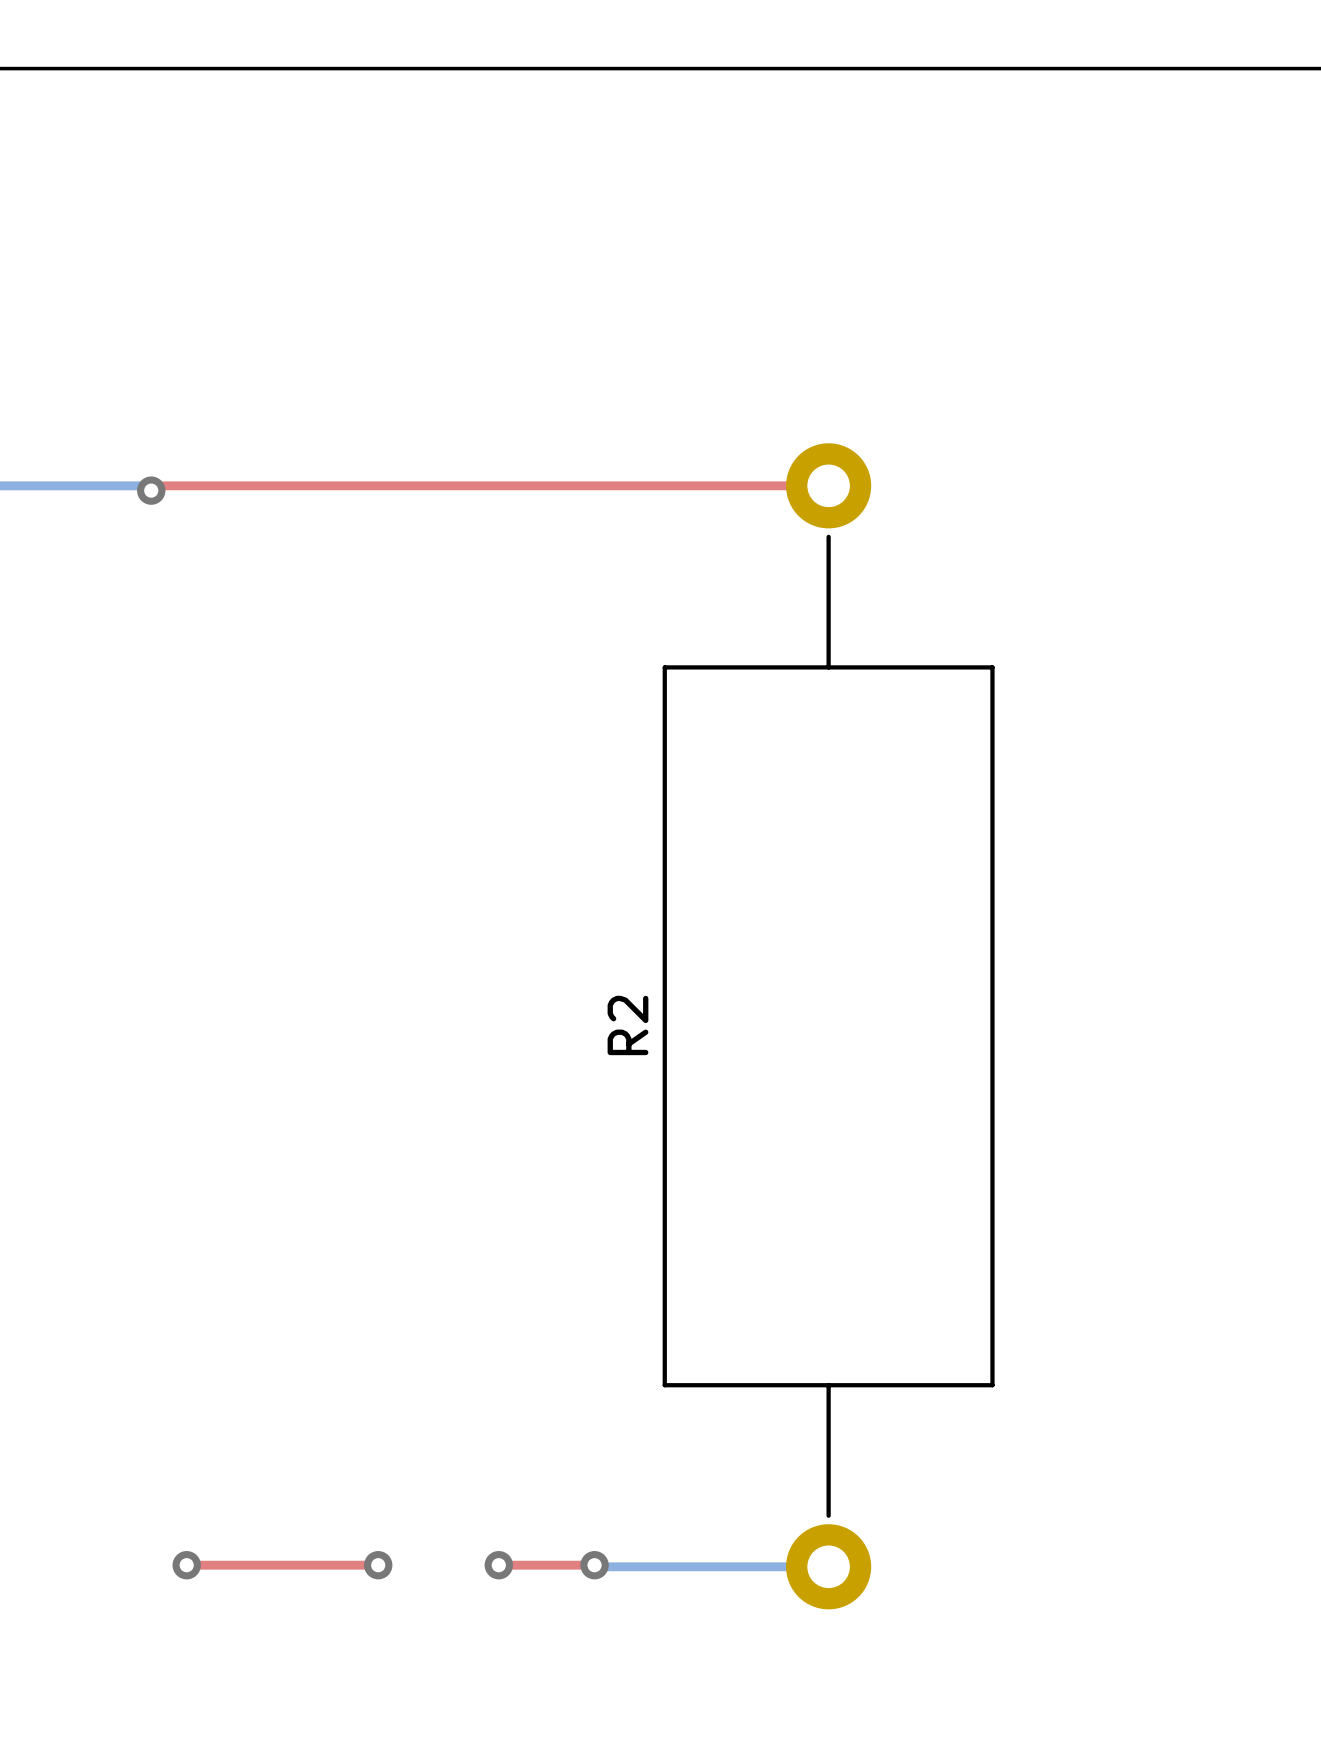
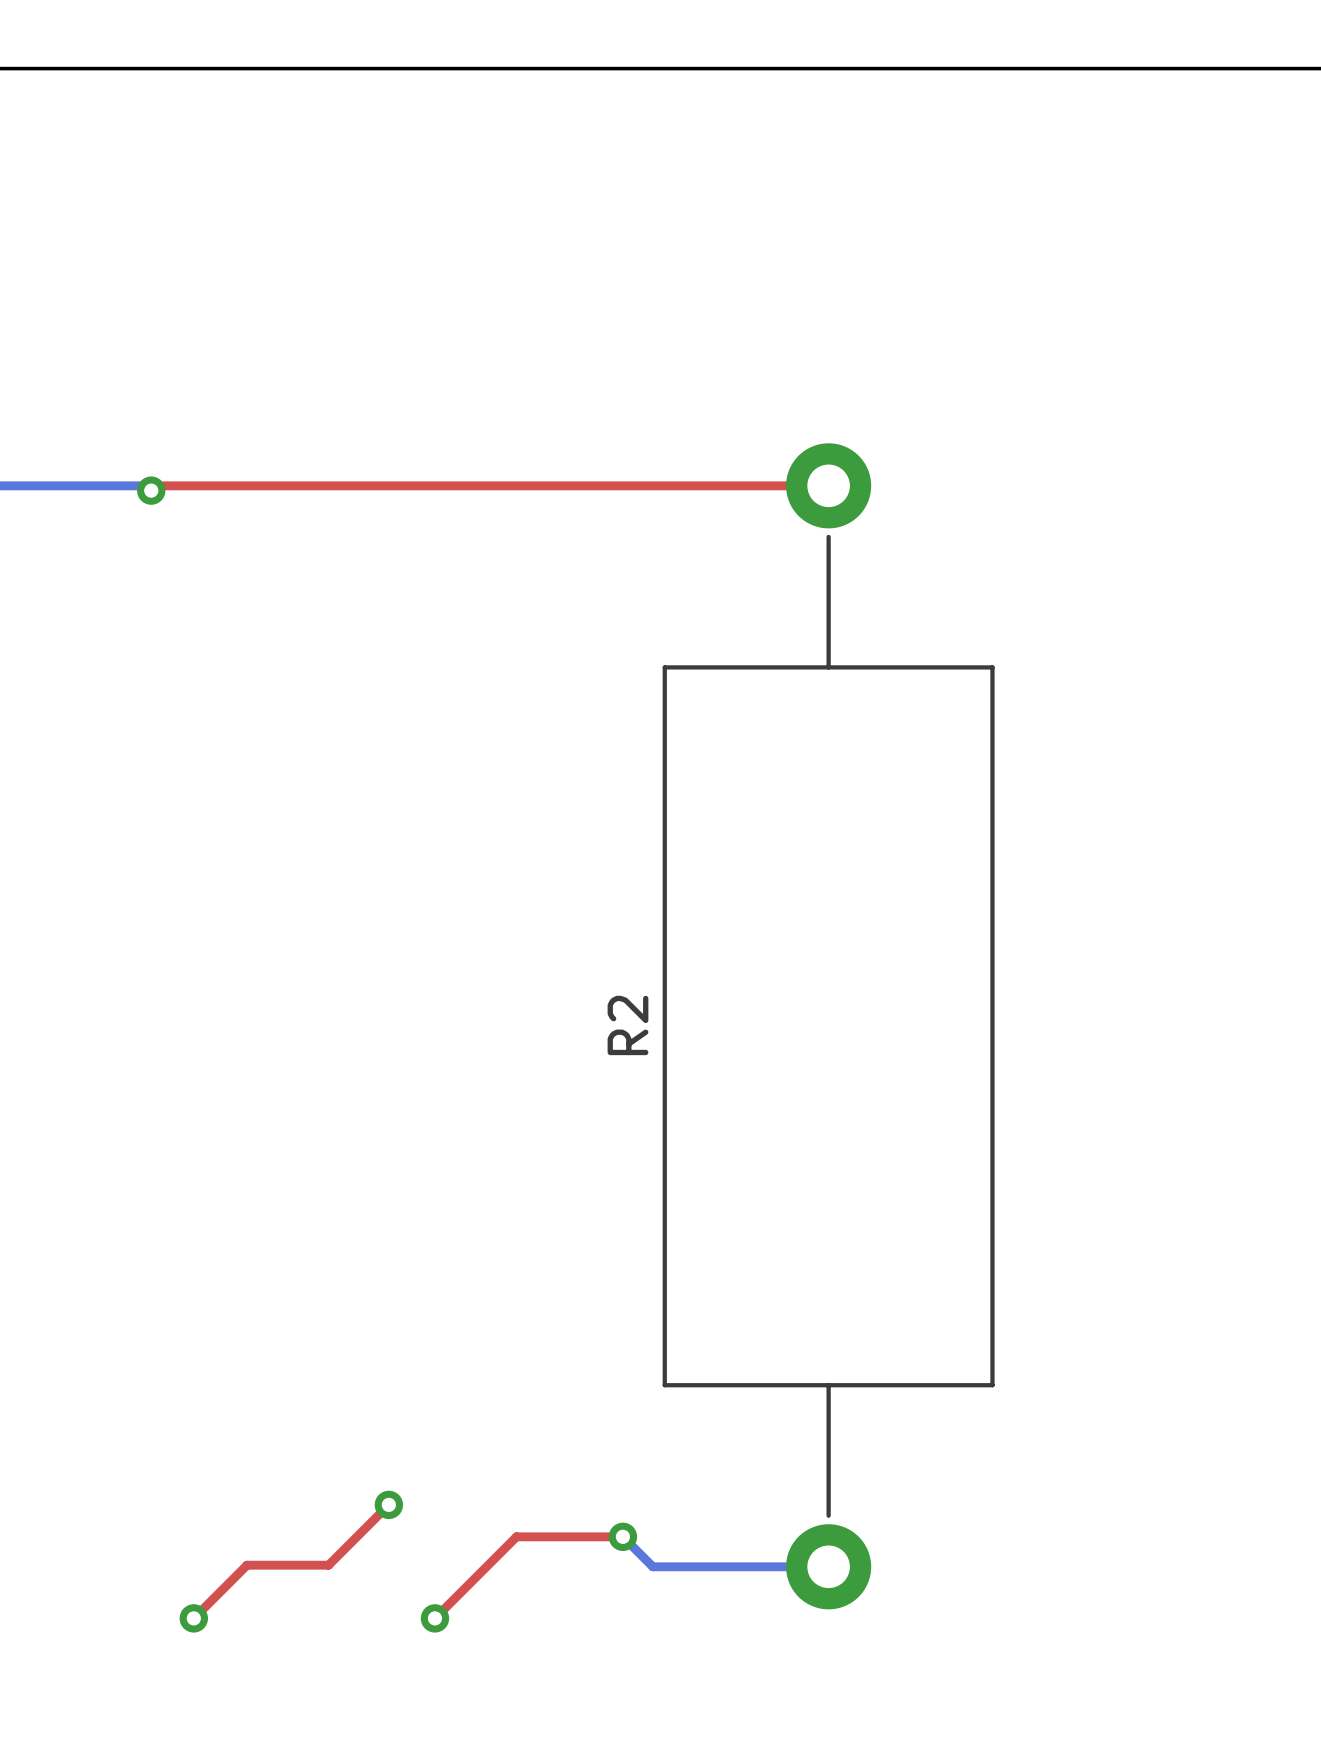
top track: none -> (622, 1536) (516, 1536) (434, 1618)
top track: (186, 1565) (247, 1565) -> (193, 1618) (247, 1565)
via position: (186, 1565) -> (193, 1618)
top track: (328, 1565) (378, 1565) -> (328, 1565) (388, 1504)
via position: (378, 1565) -> (388, 1504)
top track: (498, 1565) (594, 1565) -> none
via position: (498, 1565) -> (434, 1618)
bottom track: (594, 1565) (596, 1566) (652, 1566) -> (622, 1536) (652, 1566)
via position: (594, 1565) -> (622, 1536)

